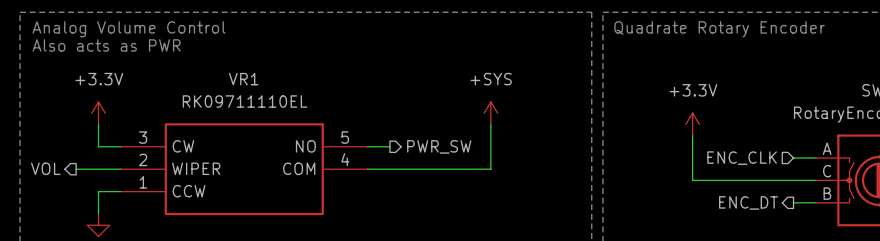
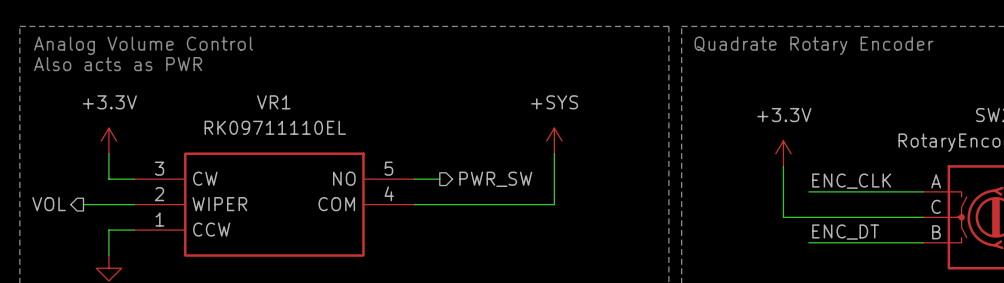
label: none -> ENC_CLK (851, 181)
wire: none -> (808, 191) (897, 191)
hierarchical label: ENC_CLK (742, 158) -> none
label: none -> ENC_DT (845, 232)
wire: none -> (808, 242) (897, 242)
hierarchical label: ENC_DT (748, 202) -> none

